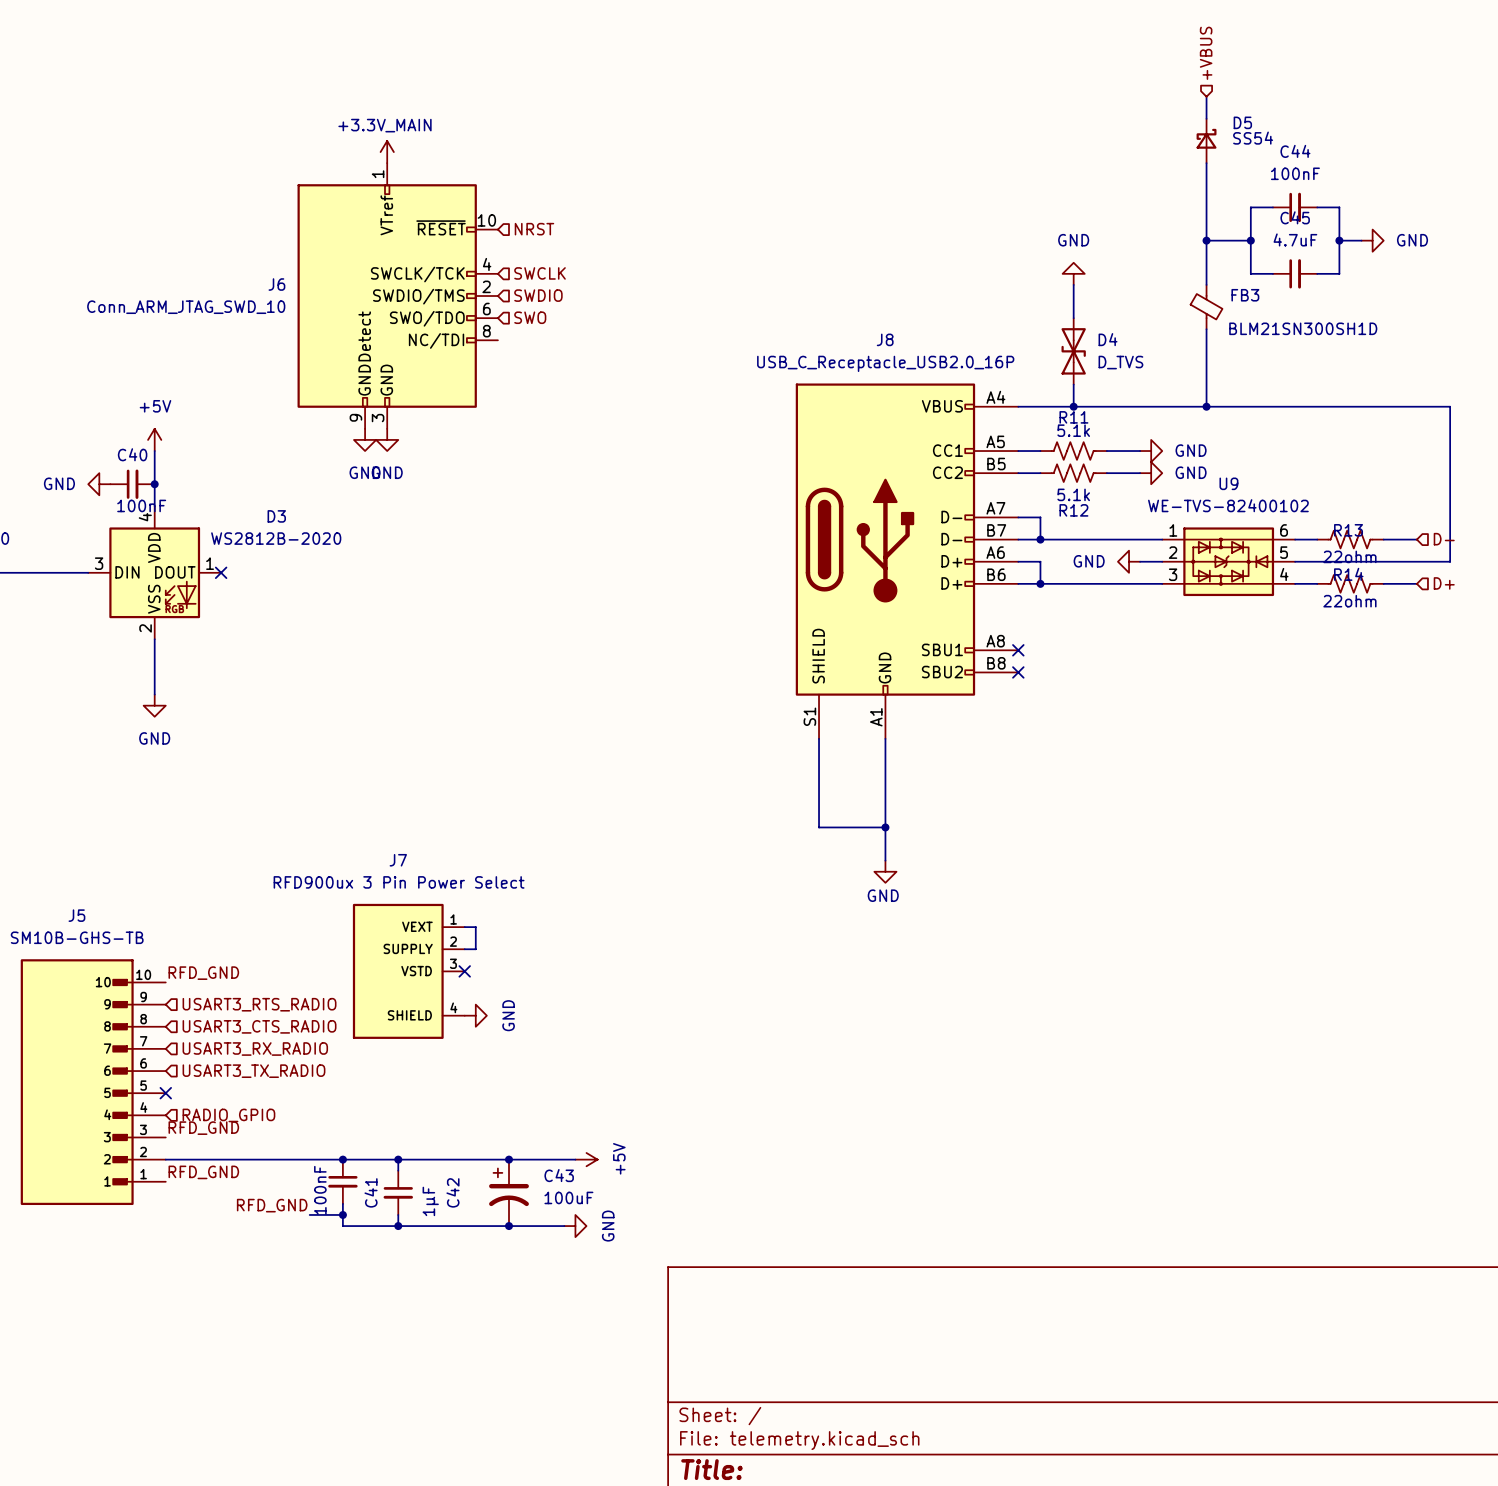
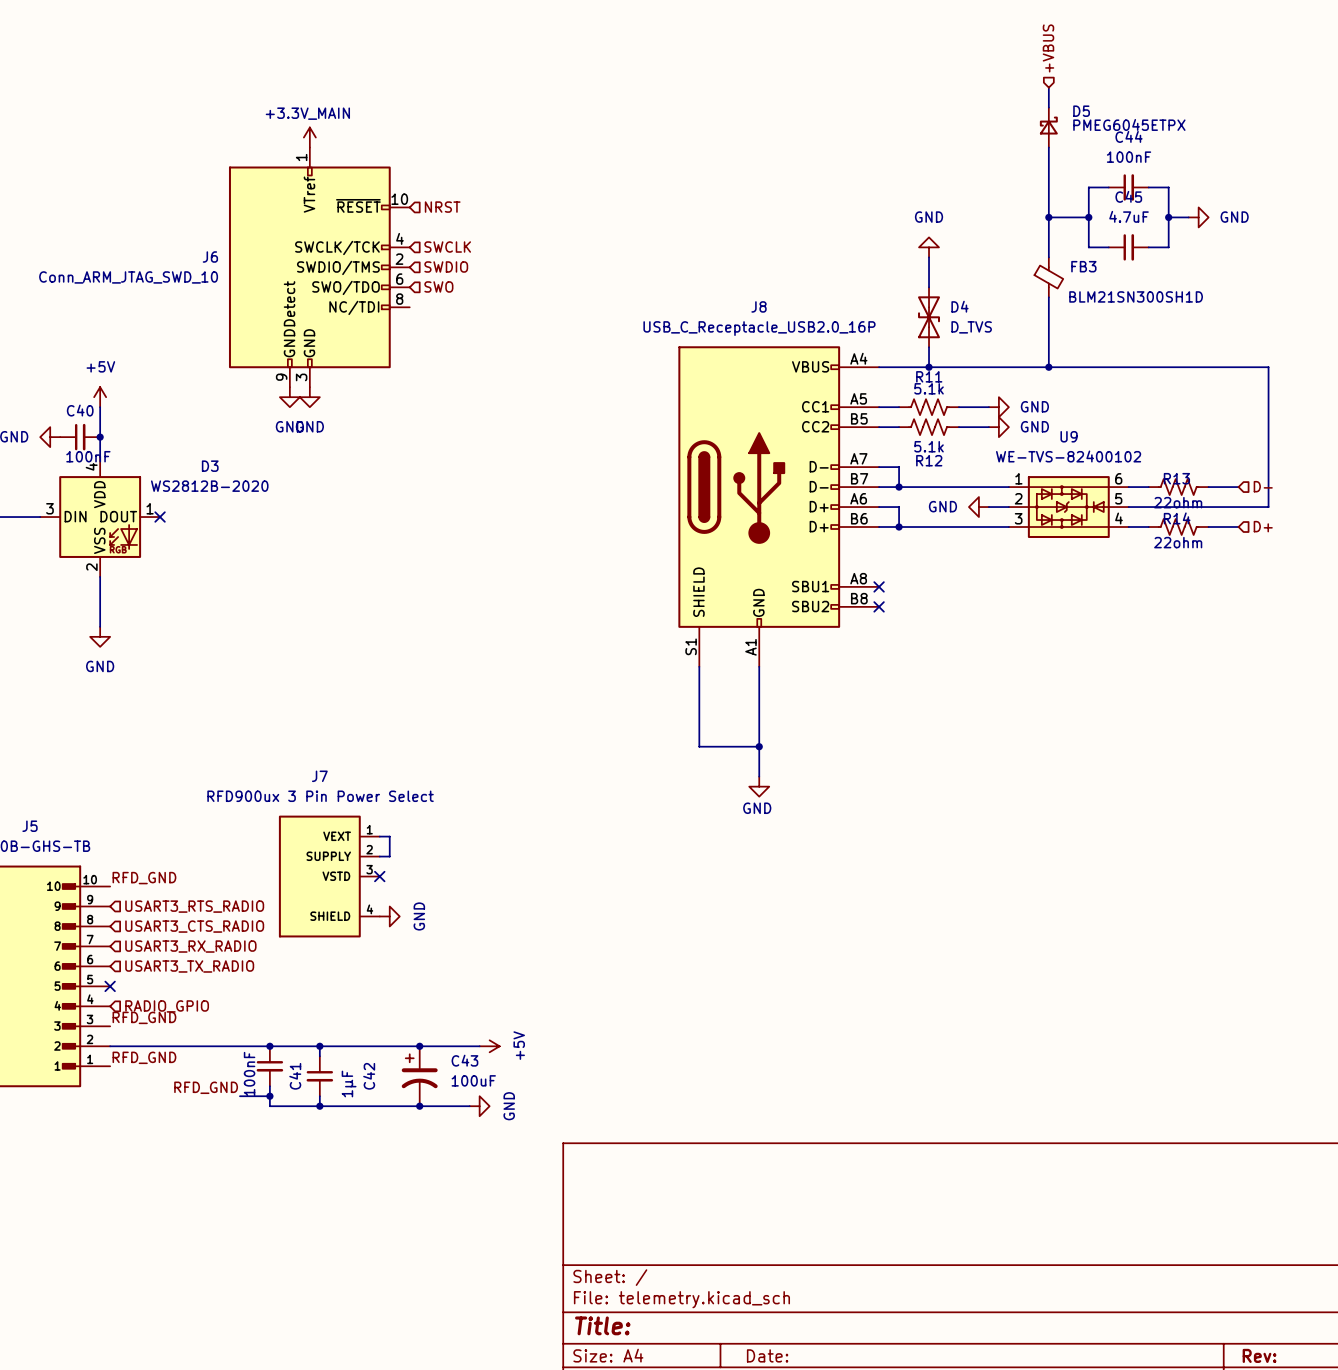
D5 value: SS54 (1253, 138) -> PMEG6045ETPX (1129, 124)

